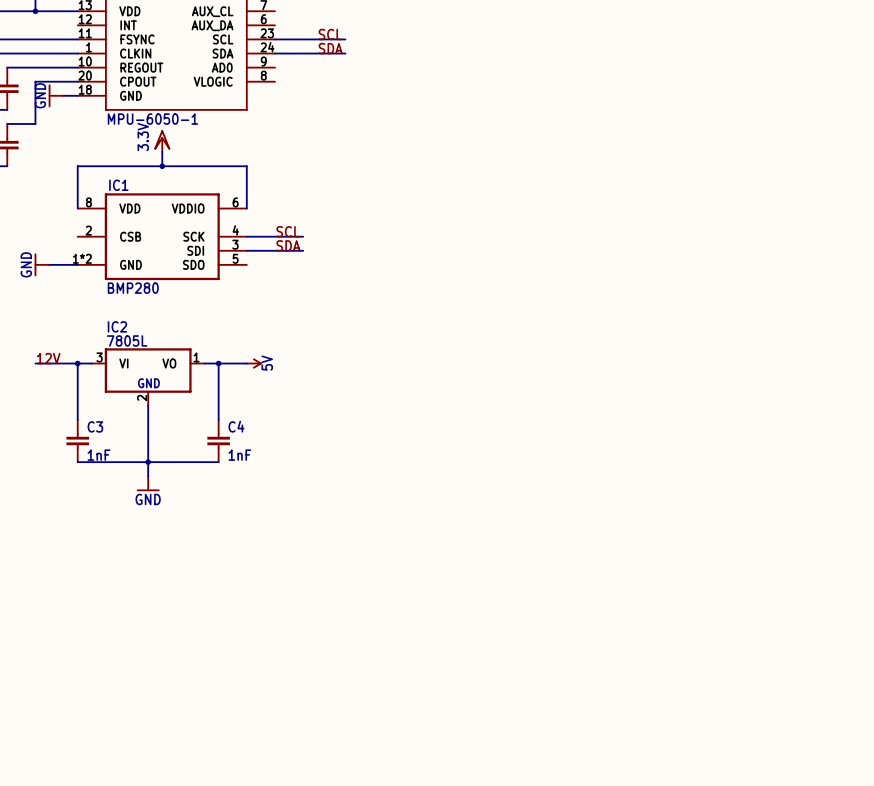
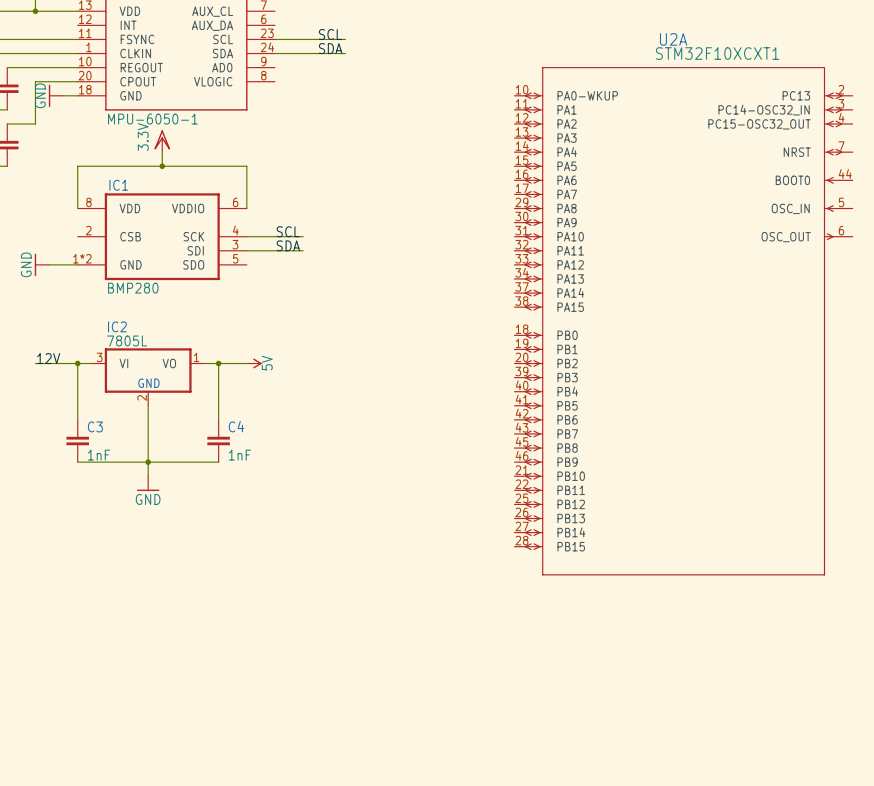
U2A: none -> STM32F10XCXT1 (683, 321)

